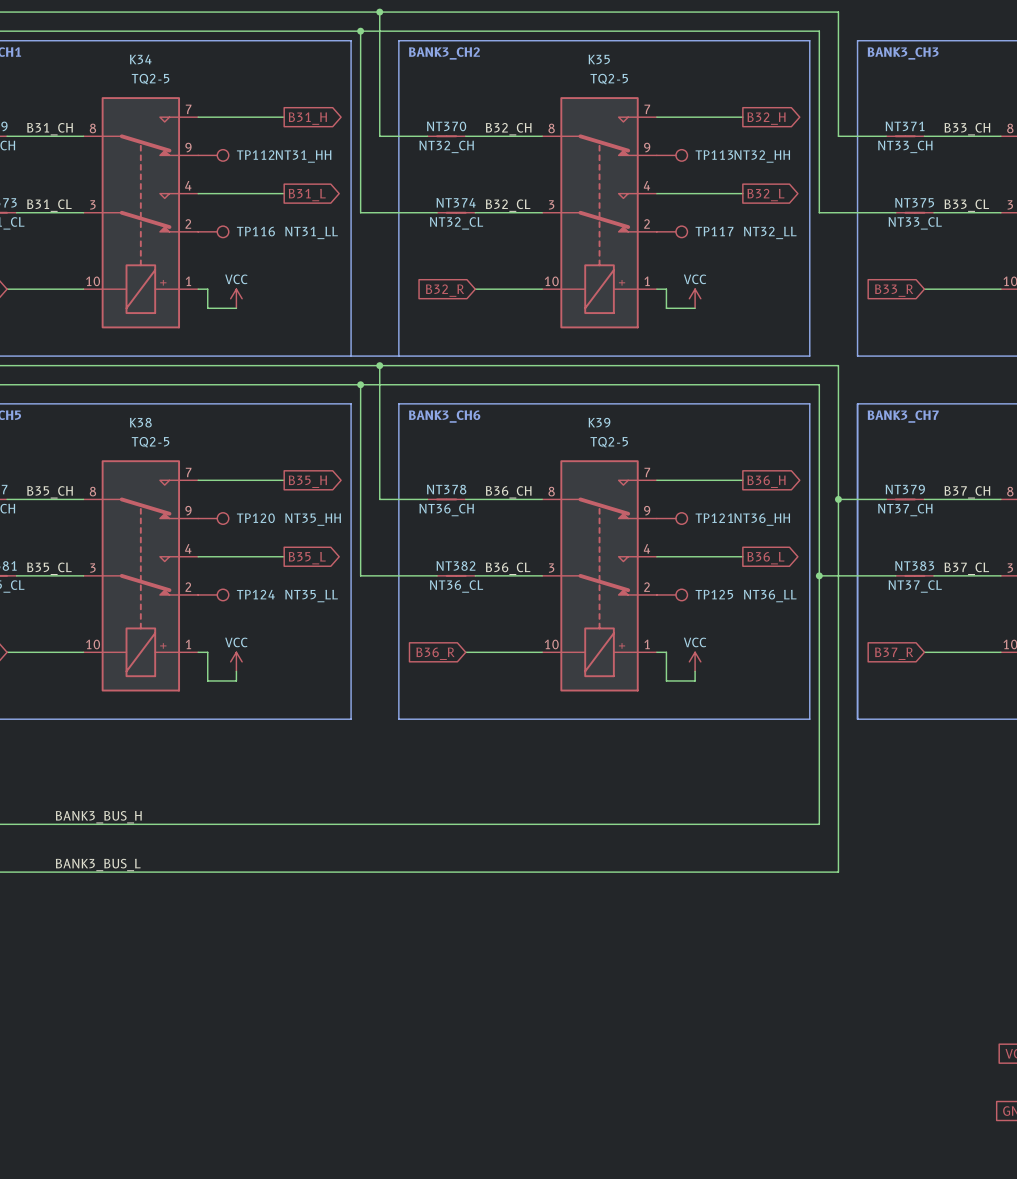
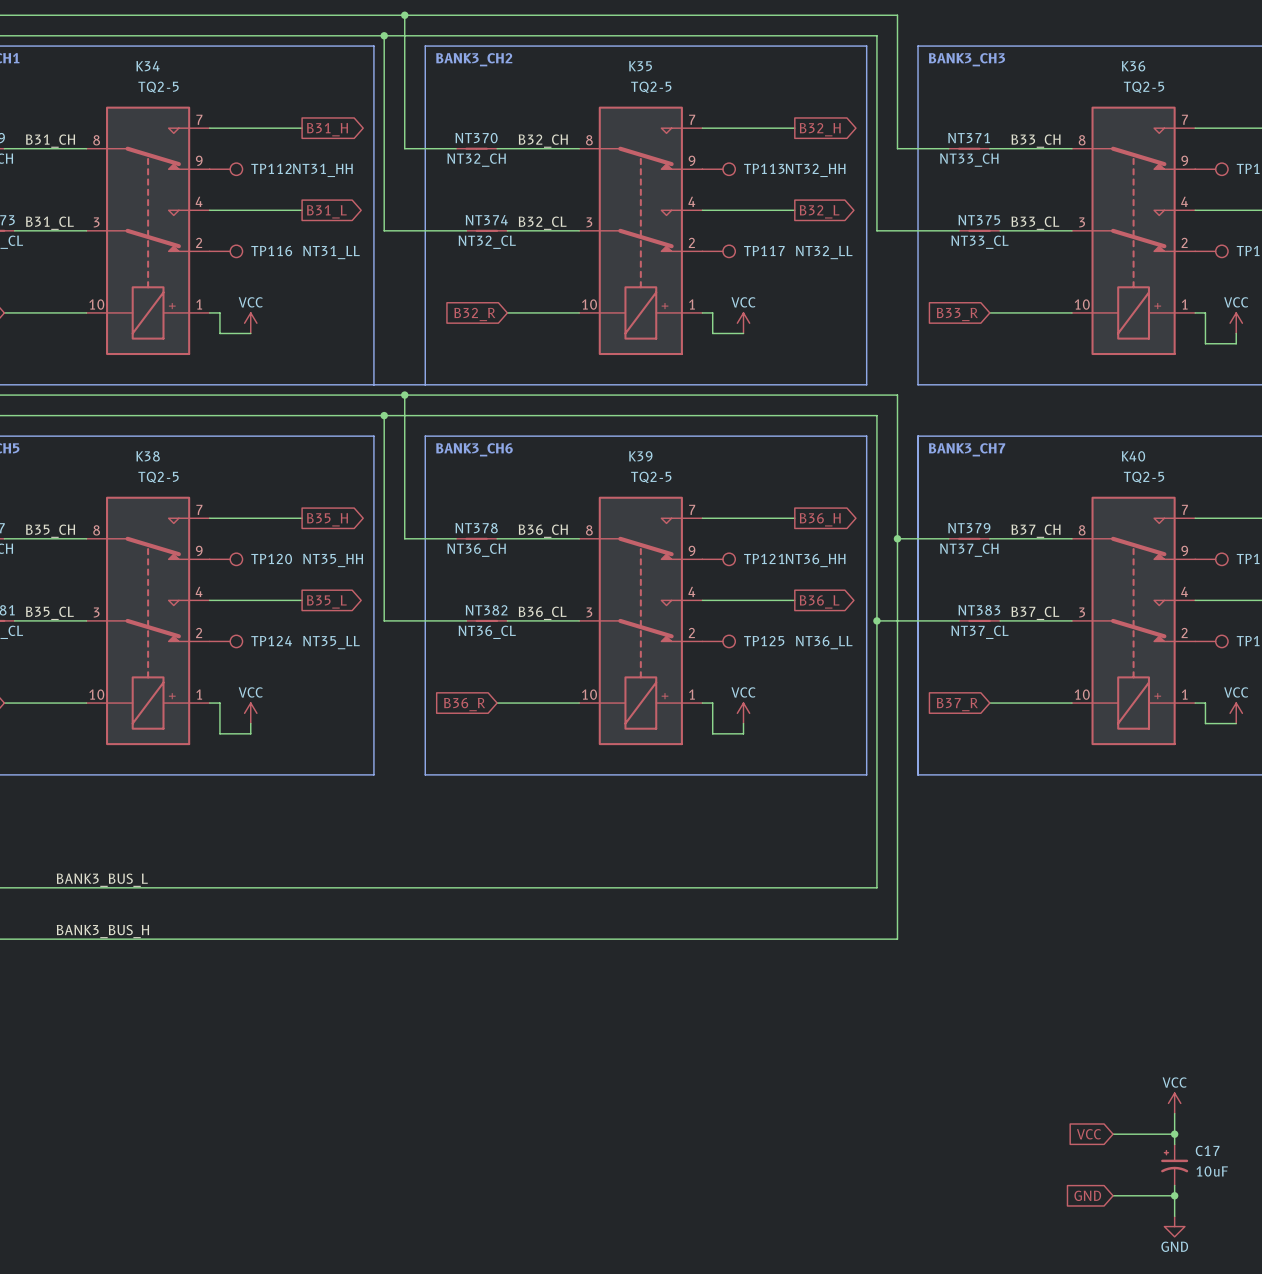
label: BANK3_BUS_H (98, 817) -> BANK3_BUS_L (102, 880)
label: BANK3_BUS_L (98, 865) -> BANK3_BUS_H (102, 931)

